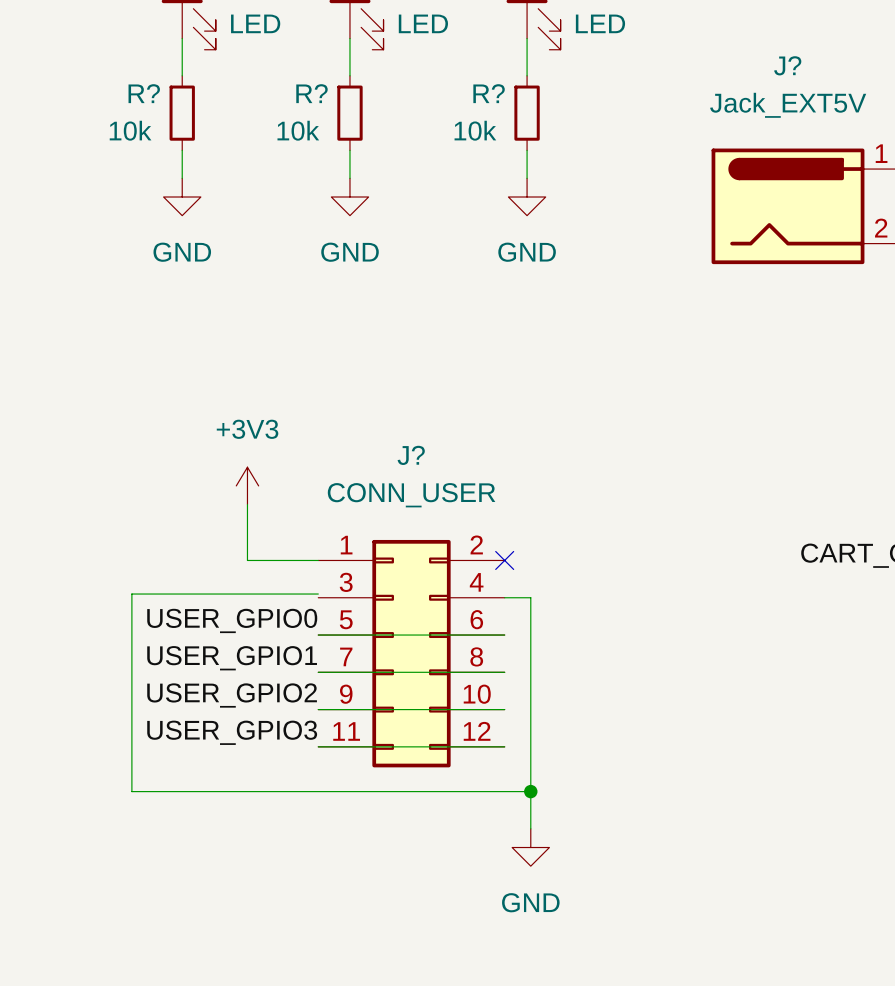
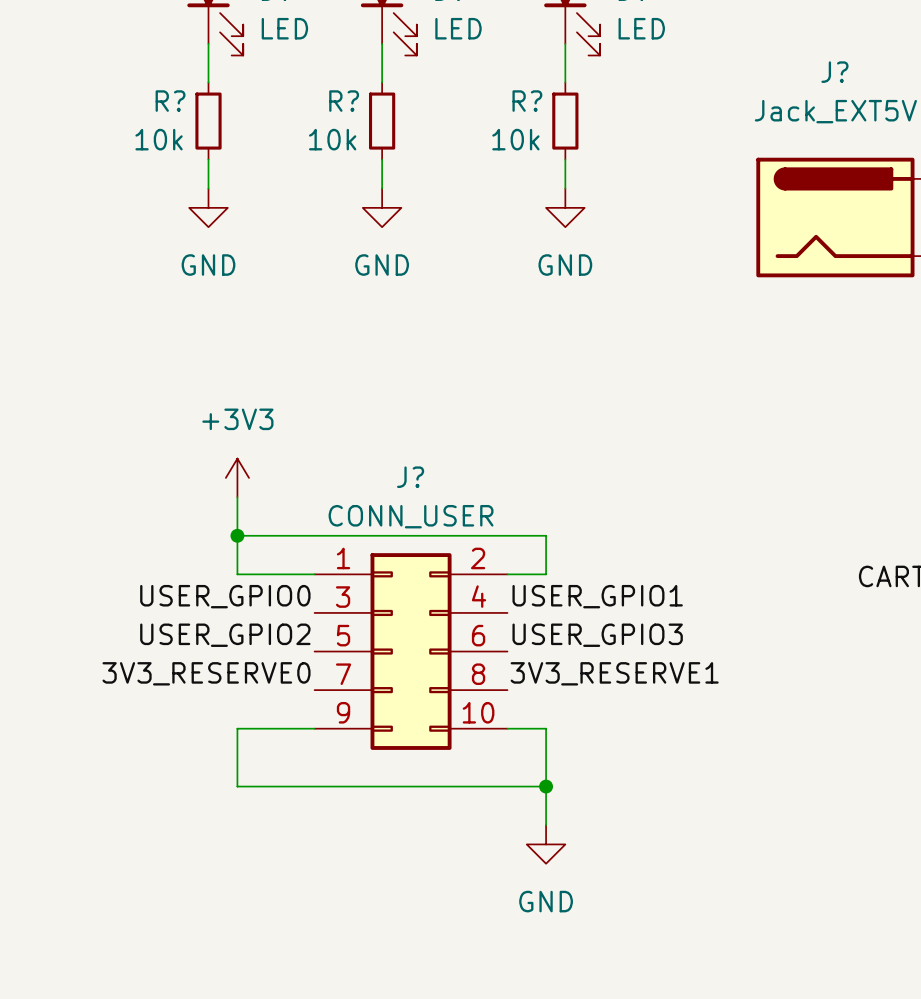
wire: none -> (237, 497) (237, 574) (314, 574)
power symbol position: +3V3 (247, 485) -> +3V3 (237, 477)
wire: (247, 504) (247, 560) (318, 560) -> none
wire: none -> (237, 535) (546, 535) (546, 574) (507, 574)
junction: none -> (237, 535)
no-connect mark: (504, 560) -> none
wire: (318, 594) (131, 594) (131, 791) (530, 791) -> none
wire: (504, 597) (530, 597) (530, 828) -> none
label position: USER_GPIO0 (232, 620) -> USER_GPIO0 (225, 596)
J?: none -> CONN_USER (411, 651)
wire: (318, 635) (504, 635) -> none
label: none -> 3V3_RESERVE0 (206, 673)
label: none -> 3V3_RESERVE1 (614, 673)
J?: CONN_USER (411, 653) -> none
label position: USER_GPIO1 (232, 658) -> USER_GPIO1 (597, 596)
wire: (318, 672) (504, 672) -> none
label position: USER_GPIO2 (232, 695) -> USER_GPIO2 (225, 635)
wire: none -> (314, 728) (237, 728) (237, 786) (546, 786)
wire: none -> (507, 728) (546, 728) (546, 825)
wire: (318, 709) (504, 709) -> none
label position: USER_GPIO3 (232, 732) -> USER_GPIO3 (597, 635)
wire: (318, 746) (504, 746) -> none
junction position: (530, 791) -> (546, 786)
power symbol position: GND (530, 847) -> GND (546, 844)

